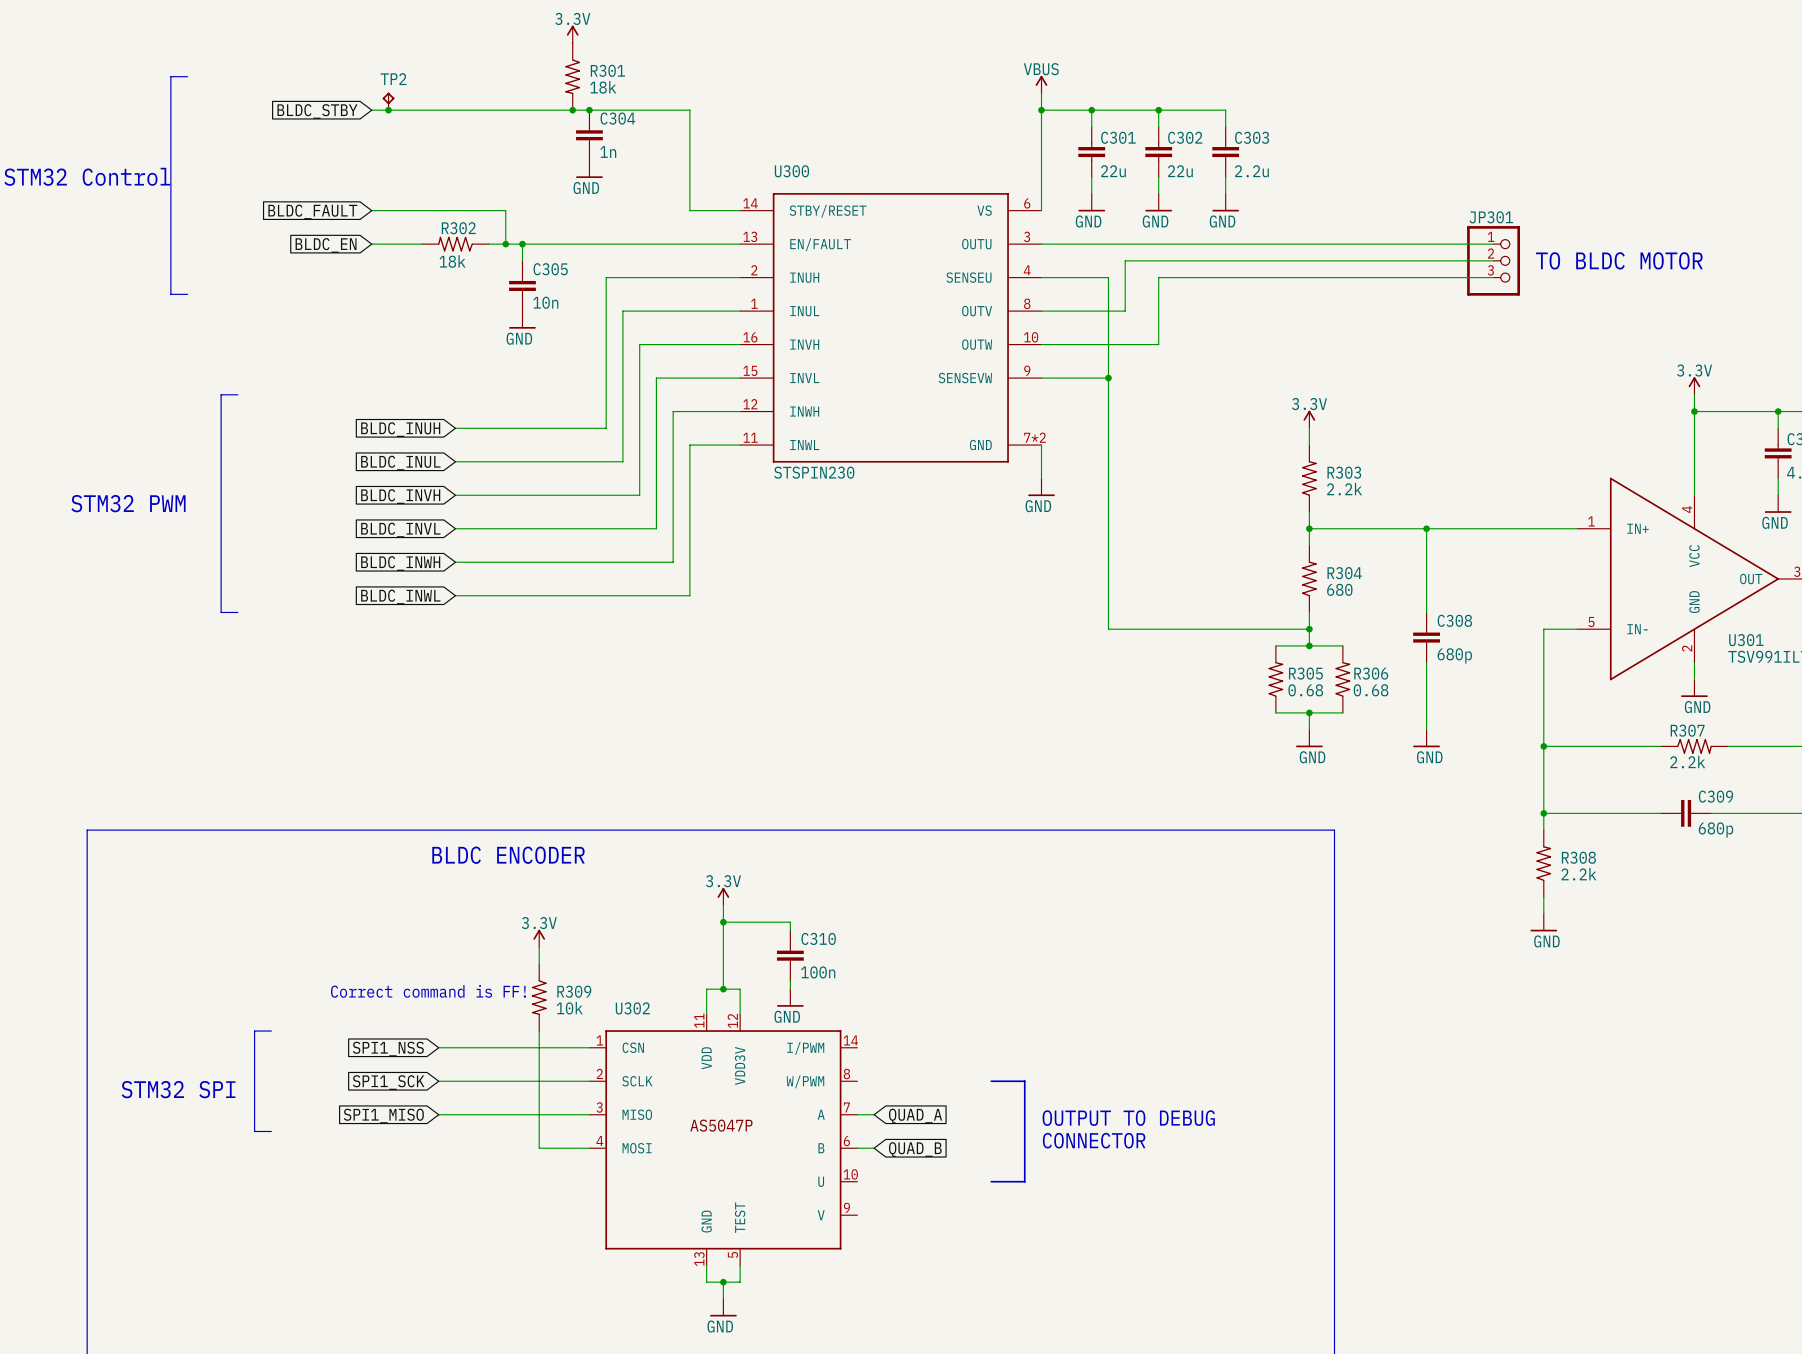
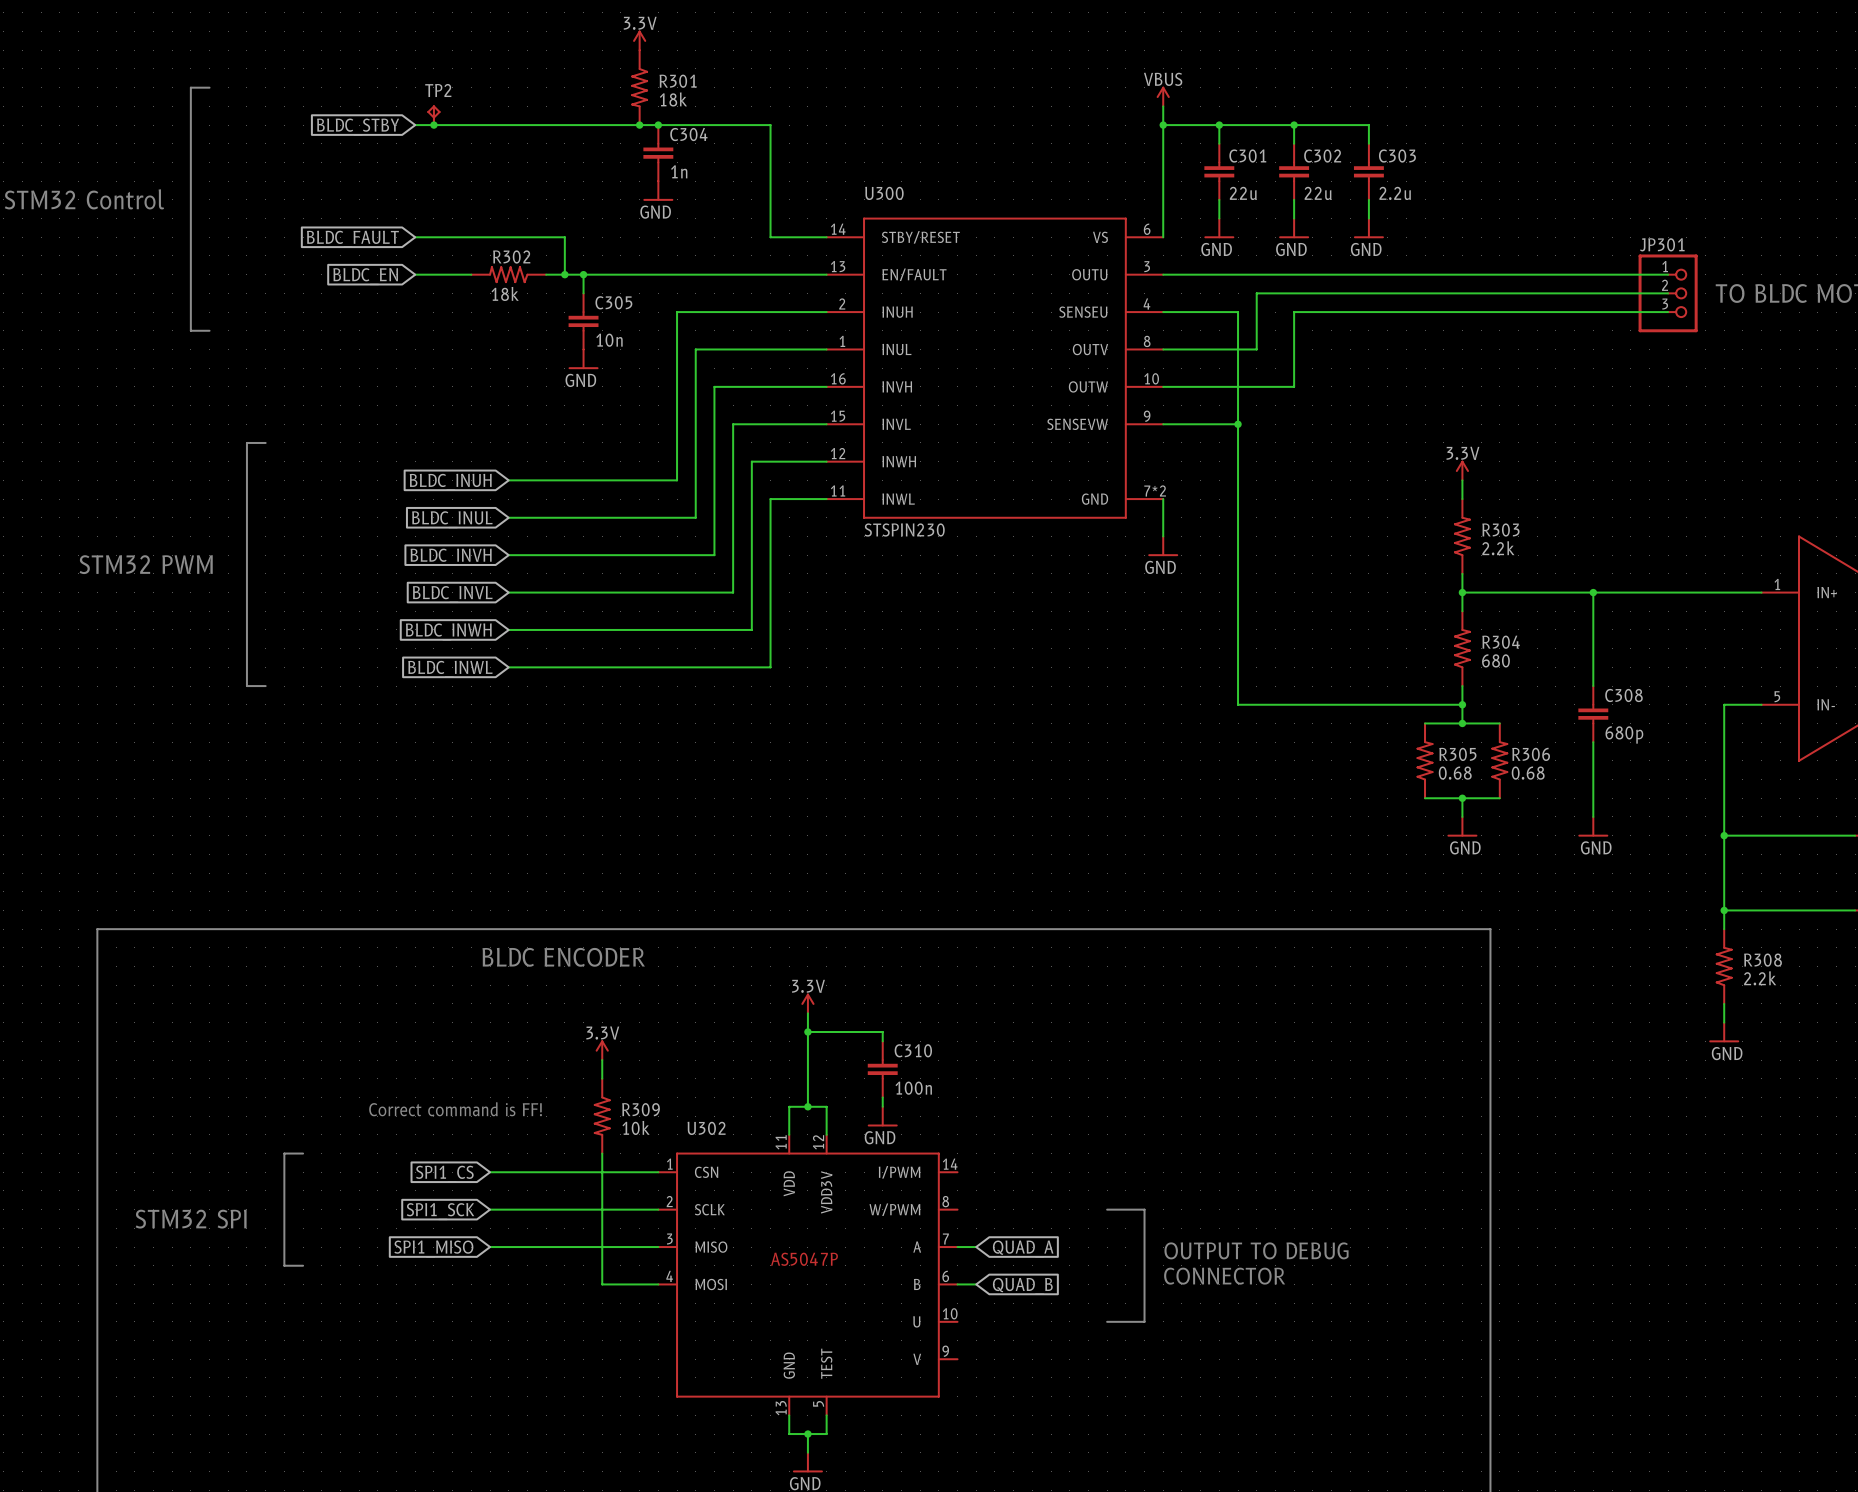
global label: SPI1_NSS (388, 1049) -> SPI1_CS (444, 1174)

